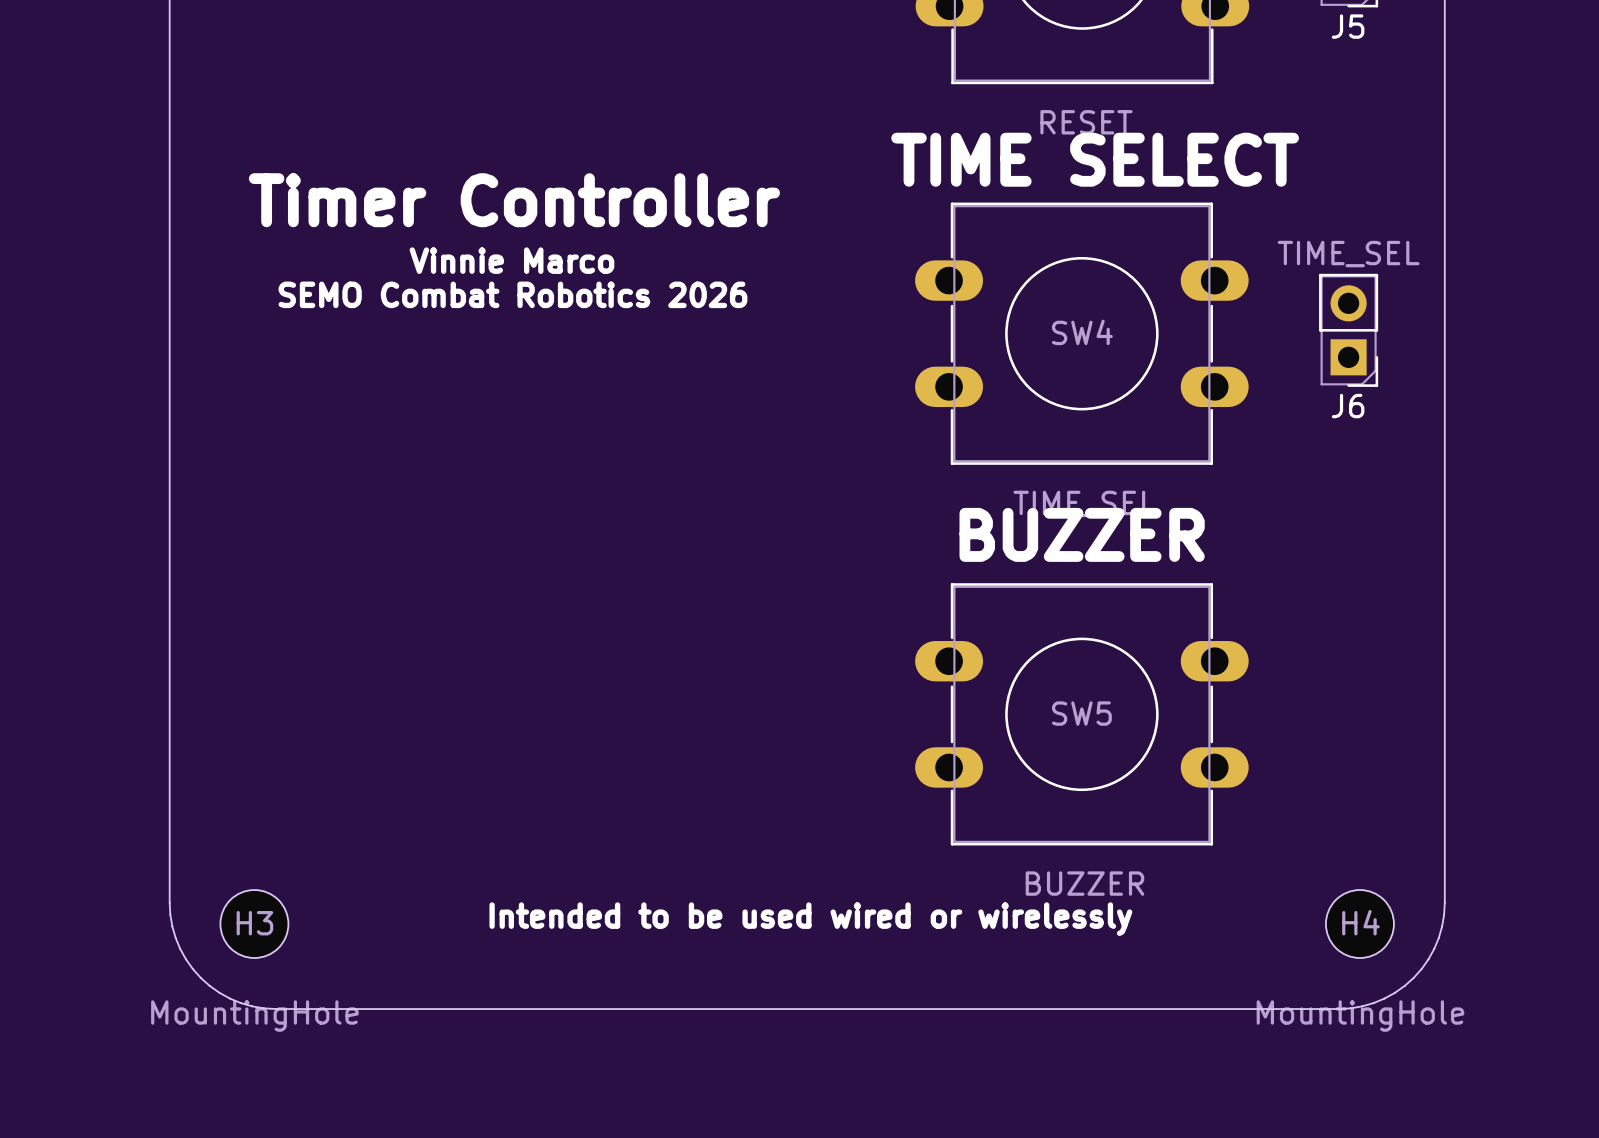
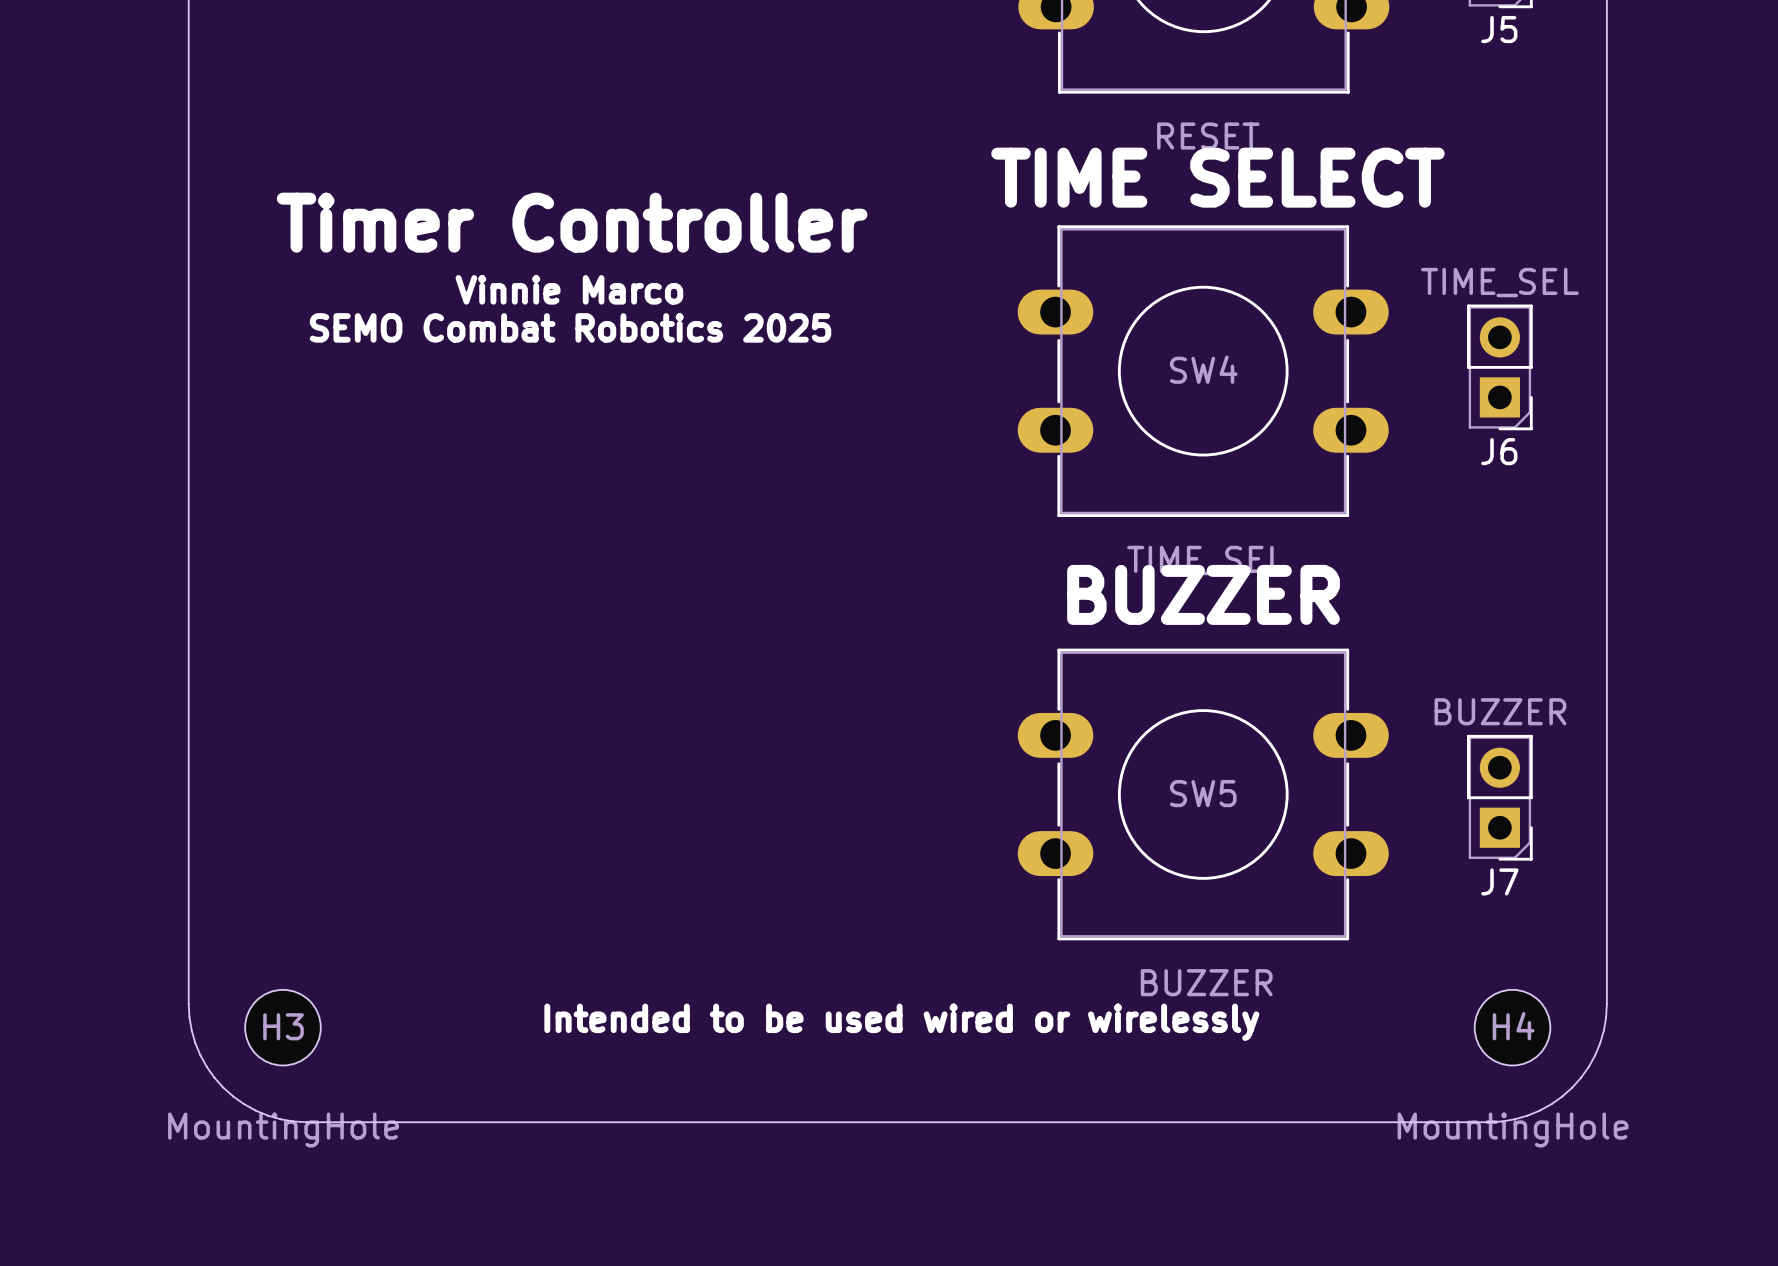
text: SEMO Combat Robotics 2026 (512, 294) -> SEMO Combat Robotics 2025 (570, 327)
J7: none -> BUZZER (1499, 797)

